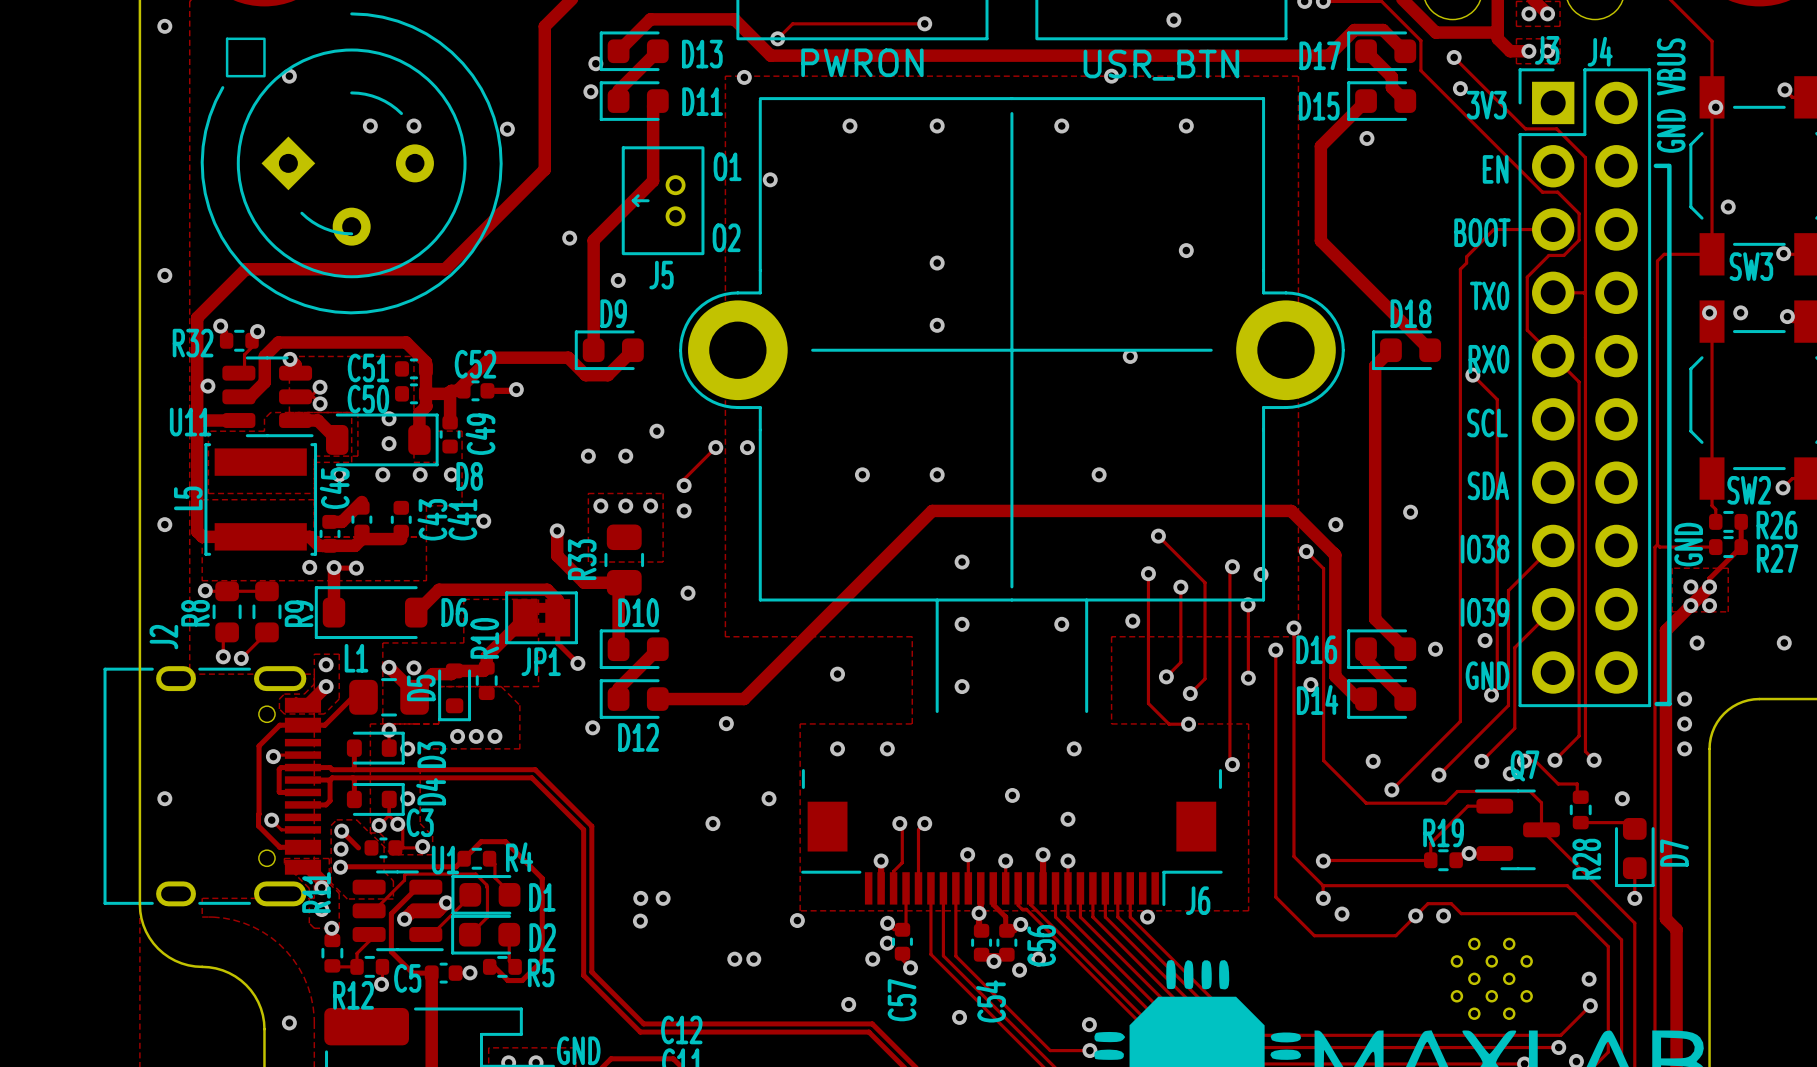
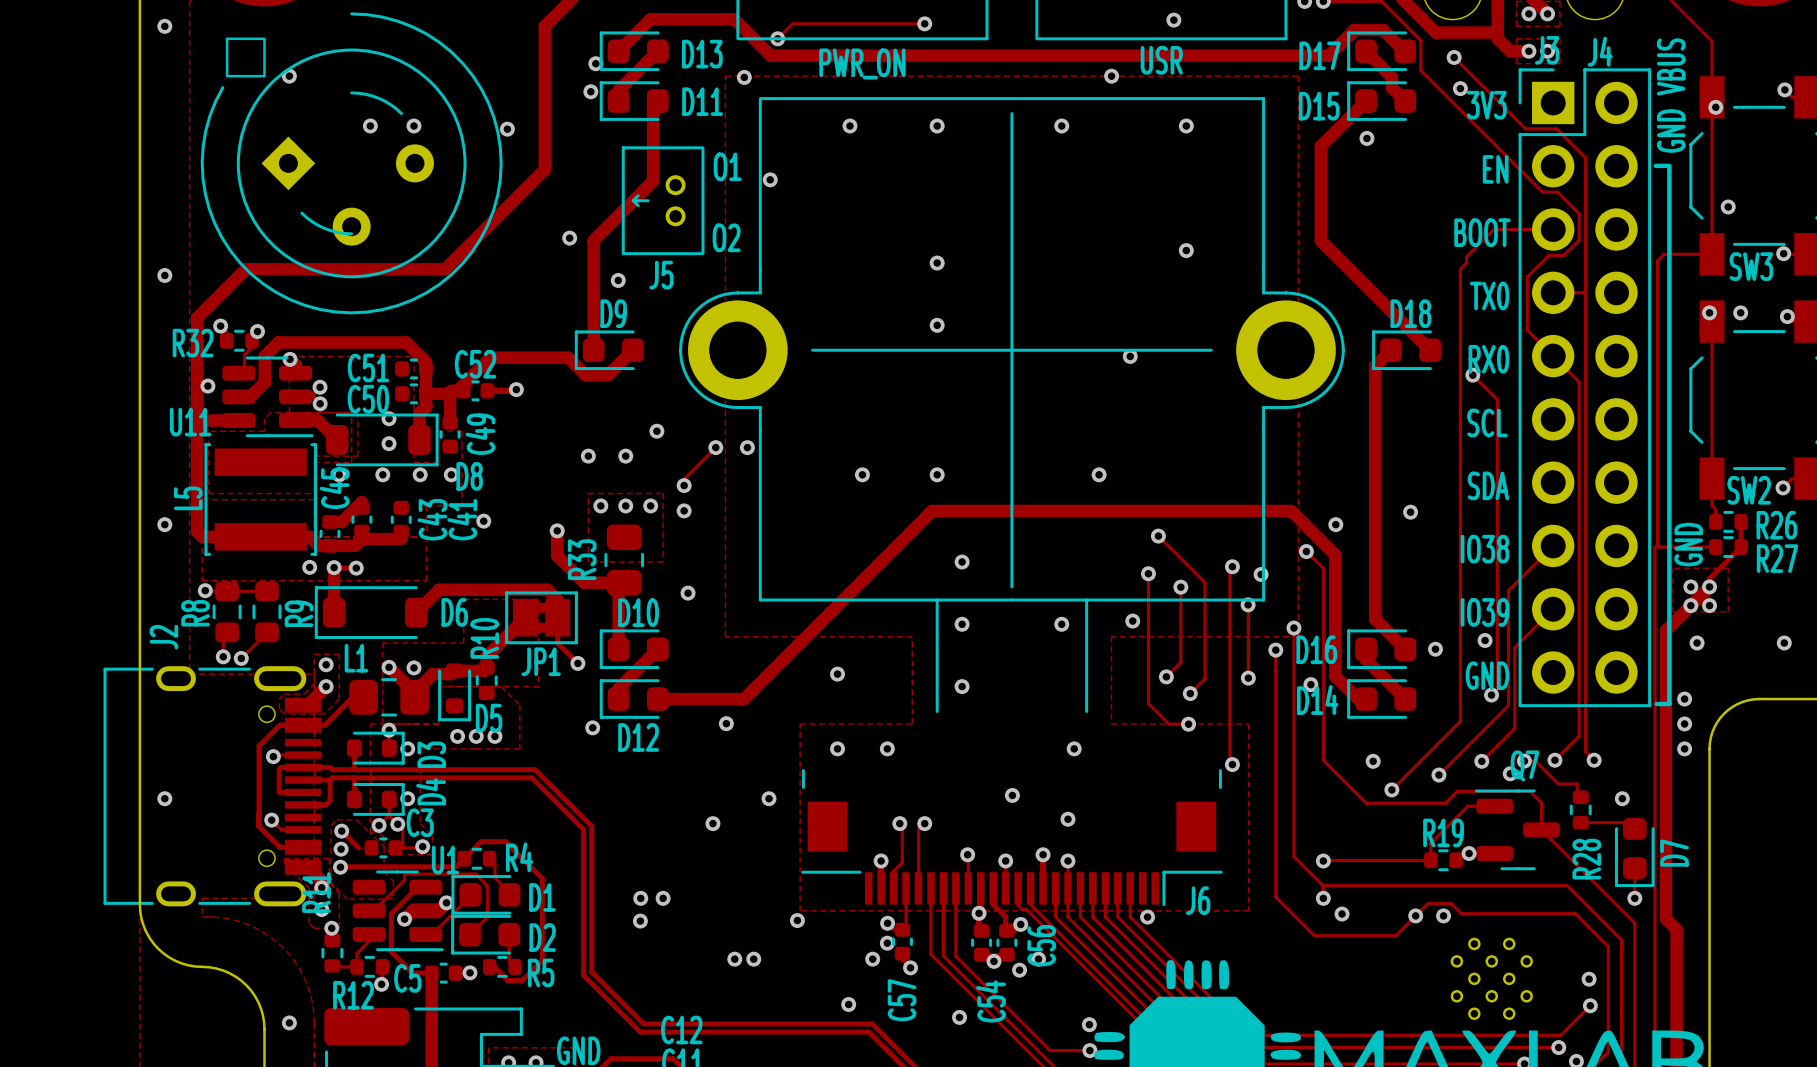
part text: none -> USR (1161, 60)
part text: PWRON (862, 62) -> PWR_ON (862, 63)
part text: USR_BTN (1161, 65) -> none
D5 name rotation: 0° (421, 687) -> 90° clockwise (489, 718)
D5 name position: D5 (421, 687) -> D5 (489, 718)

